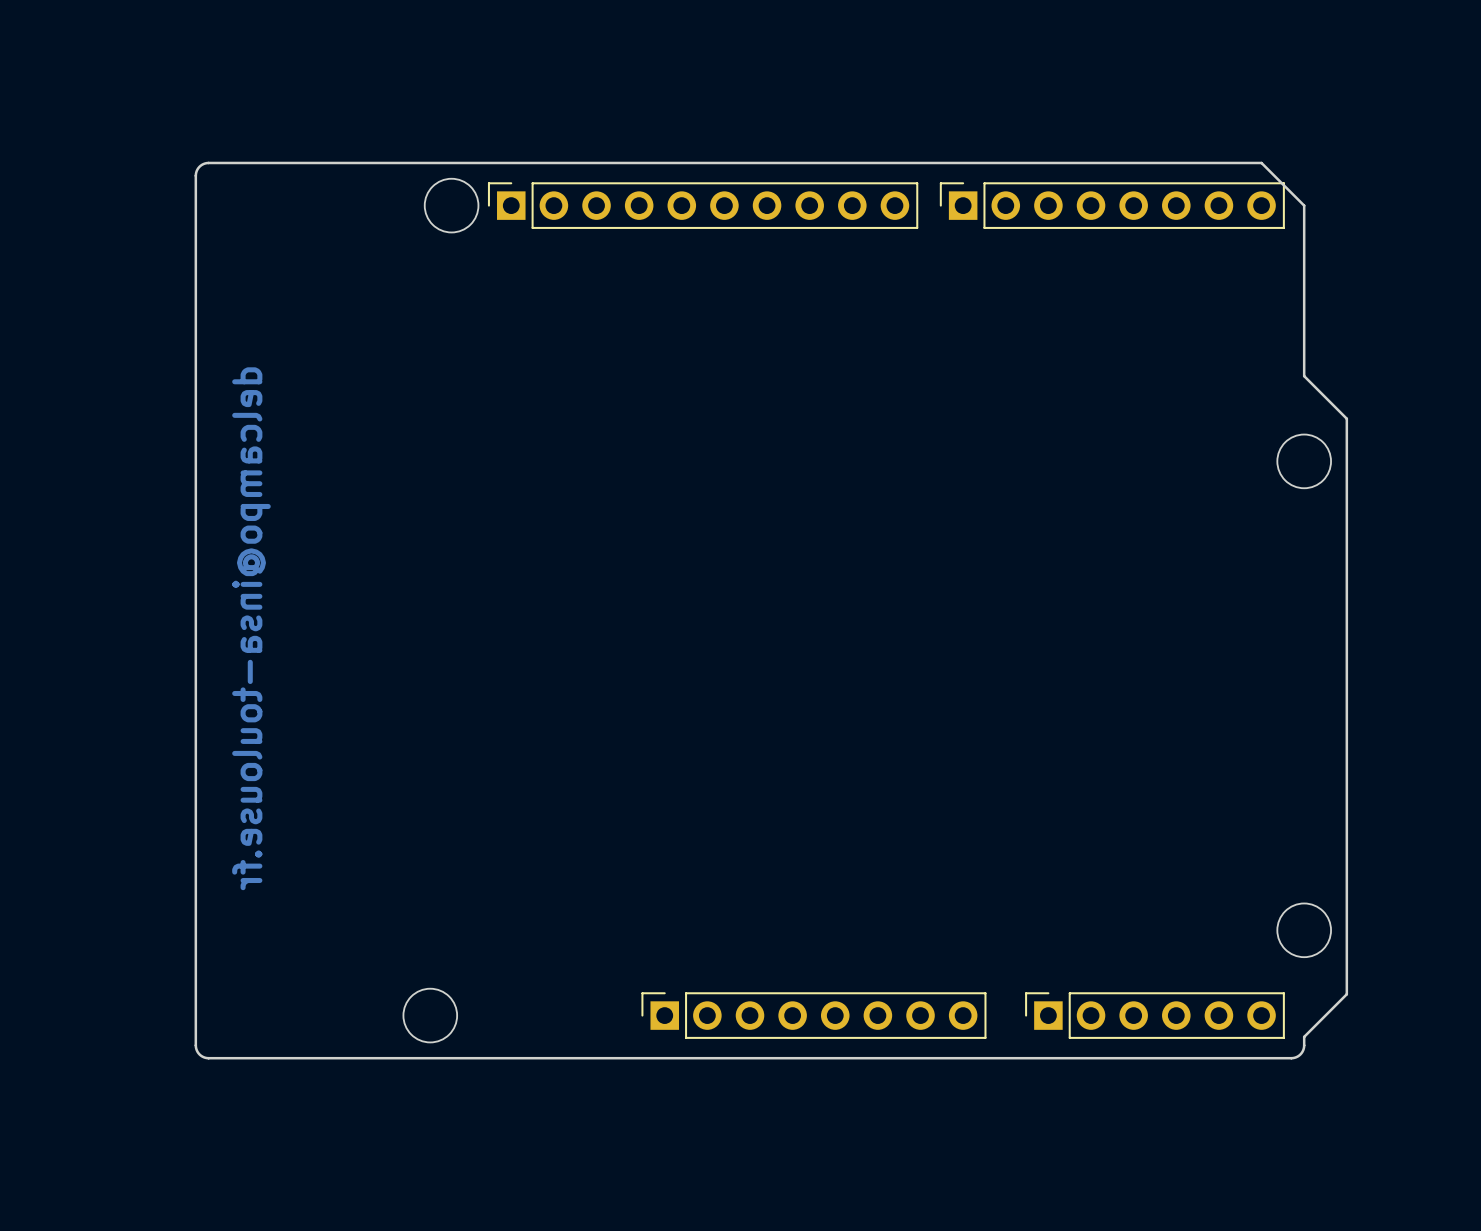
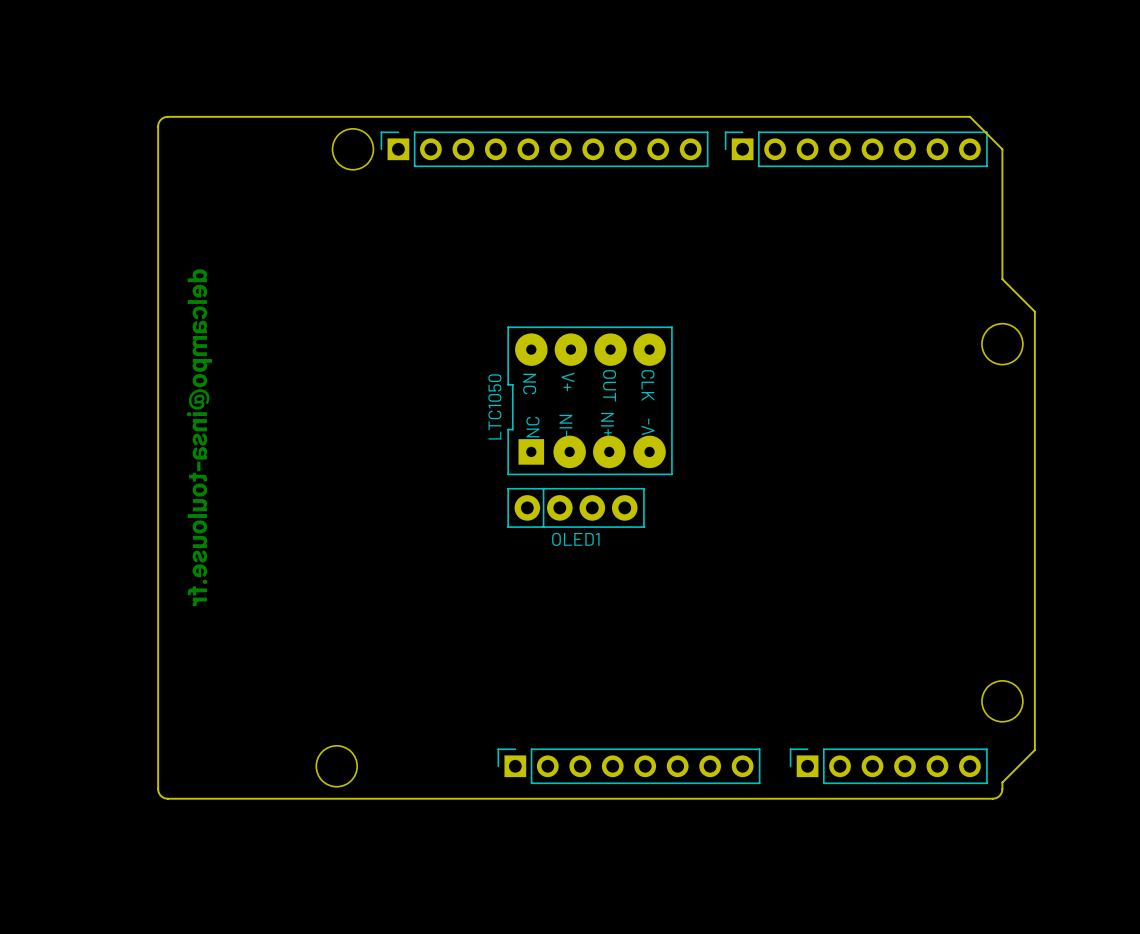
LTC1050: none -> (590, 400)
OLED1: none -> (576, 507)

